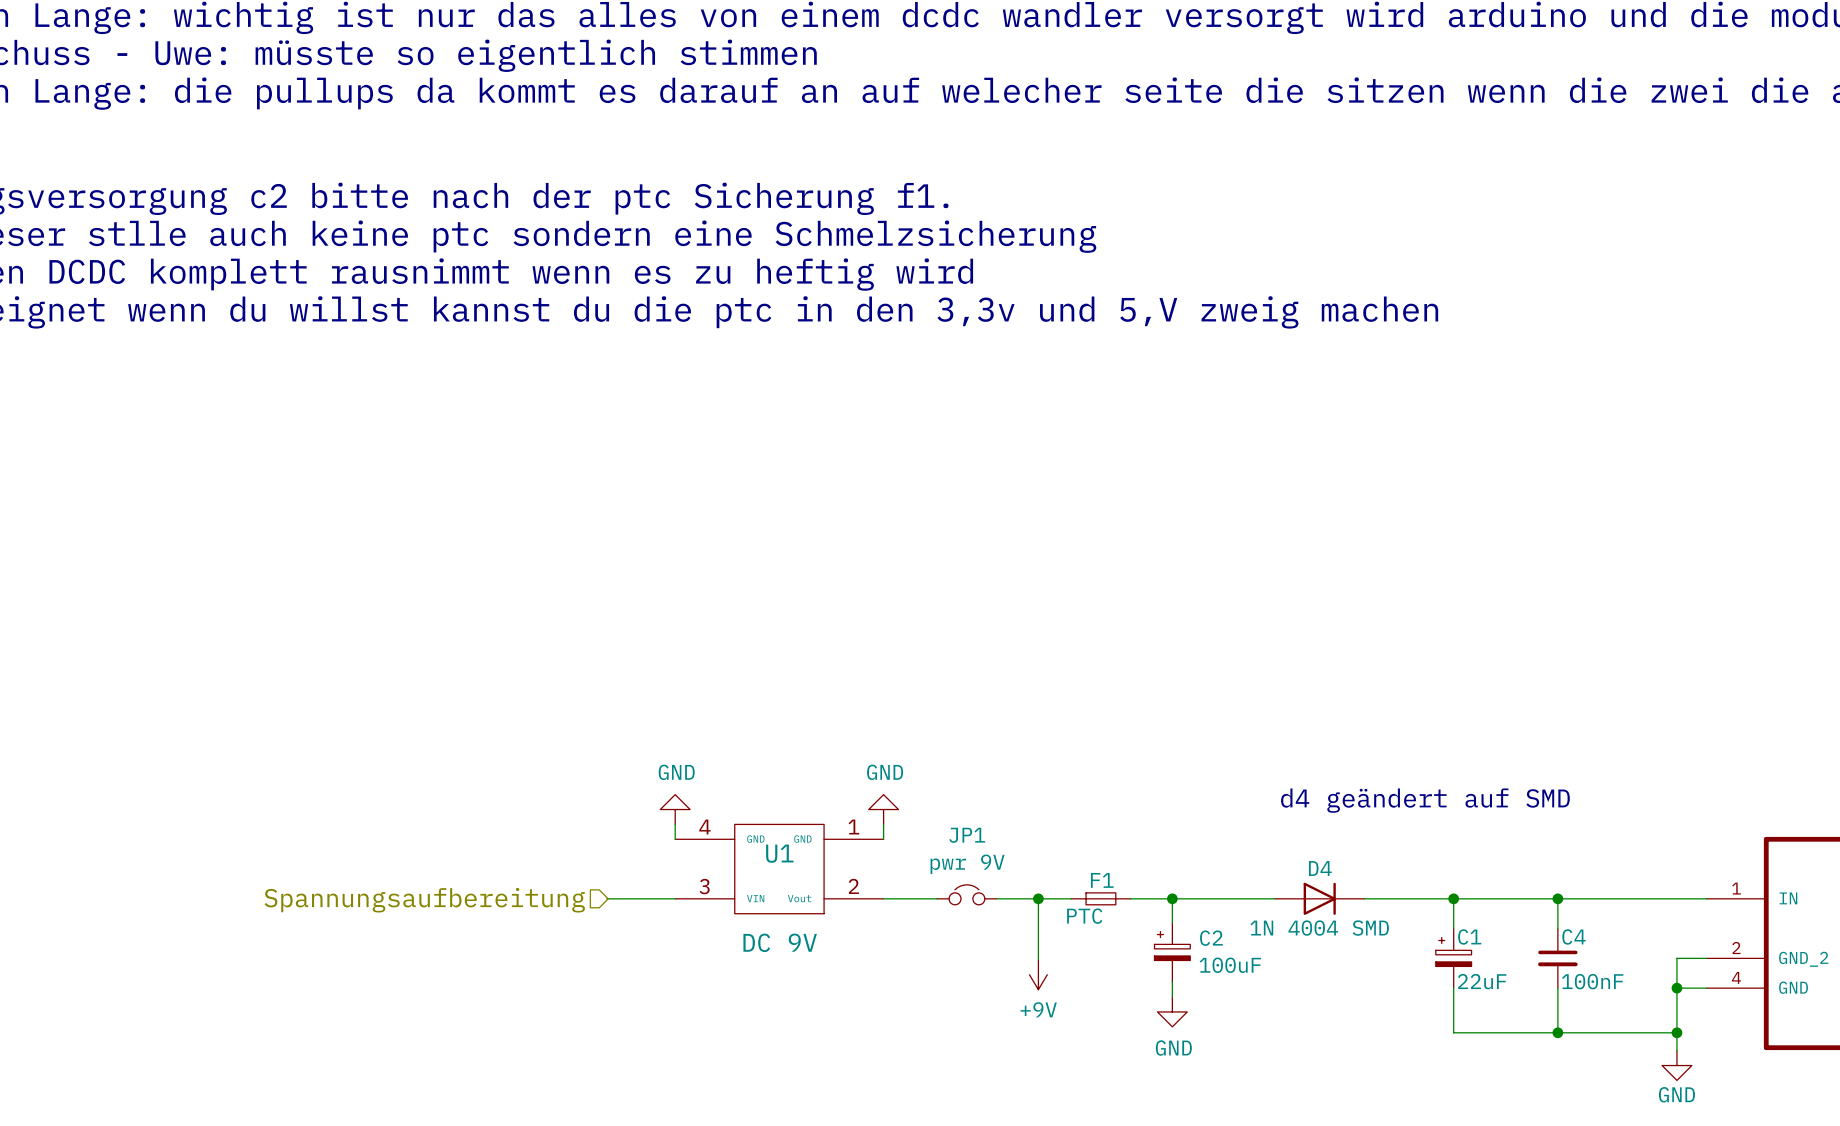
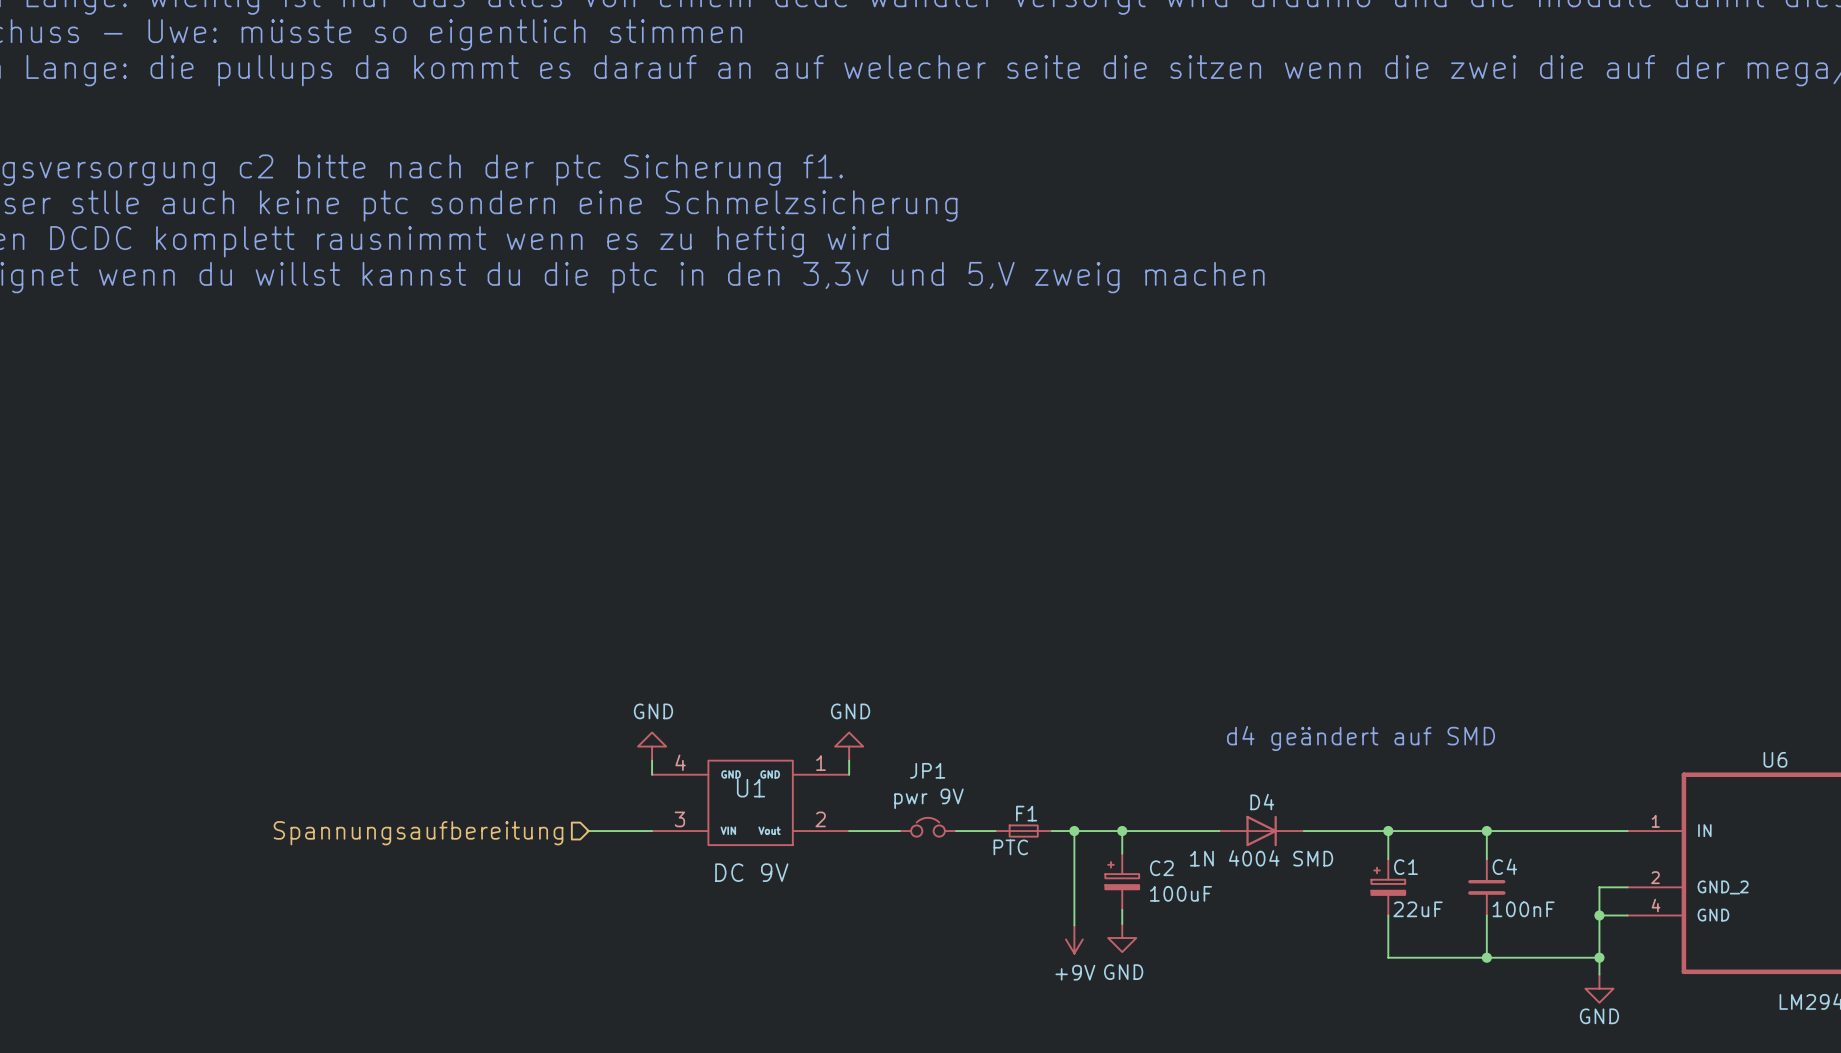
junction: (1038, 898) -> none
wire: (1071, 898) (1038, 898) (1038, 959) -> none
F1 position: (1100, 898) -> (1023, 831)
wire: none -> (1074, 831) (1074, 925)
junction: none -> (1074, 831)
power symbol position: +9V (1038, 974) -> +9V (1074, 939)

